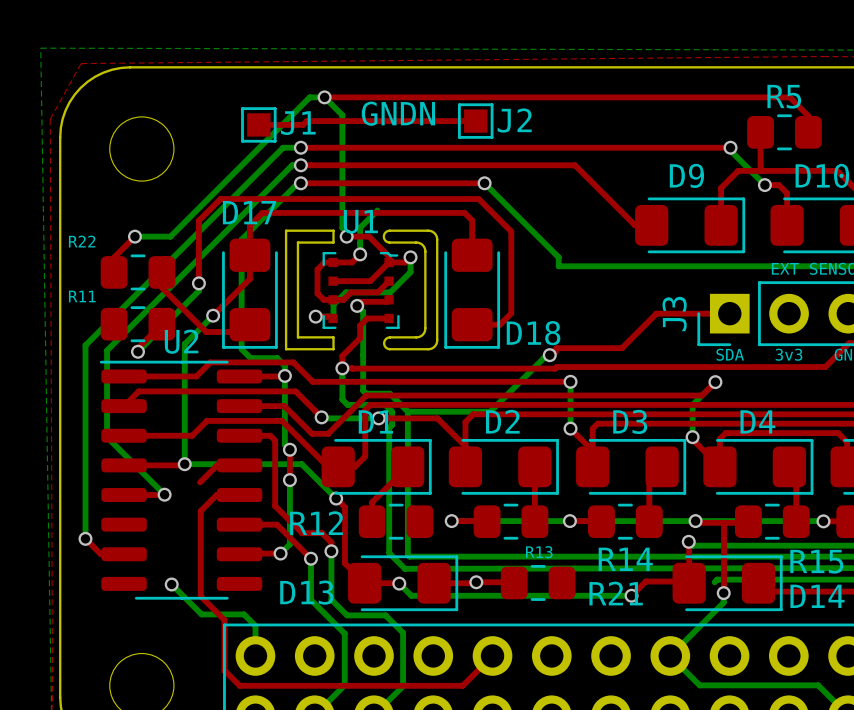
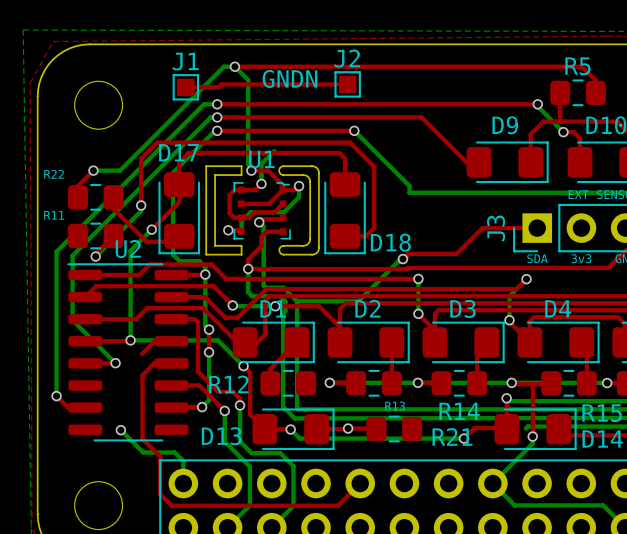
J2 name position: J2 (514, 120) -> J2 (347, 58)
J1 name position: J1 (298, 123) -> J1 (185, 61)

